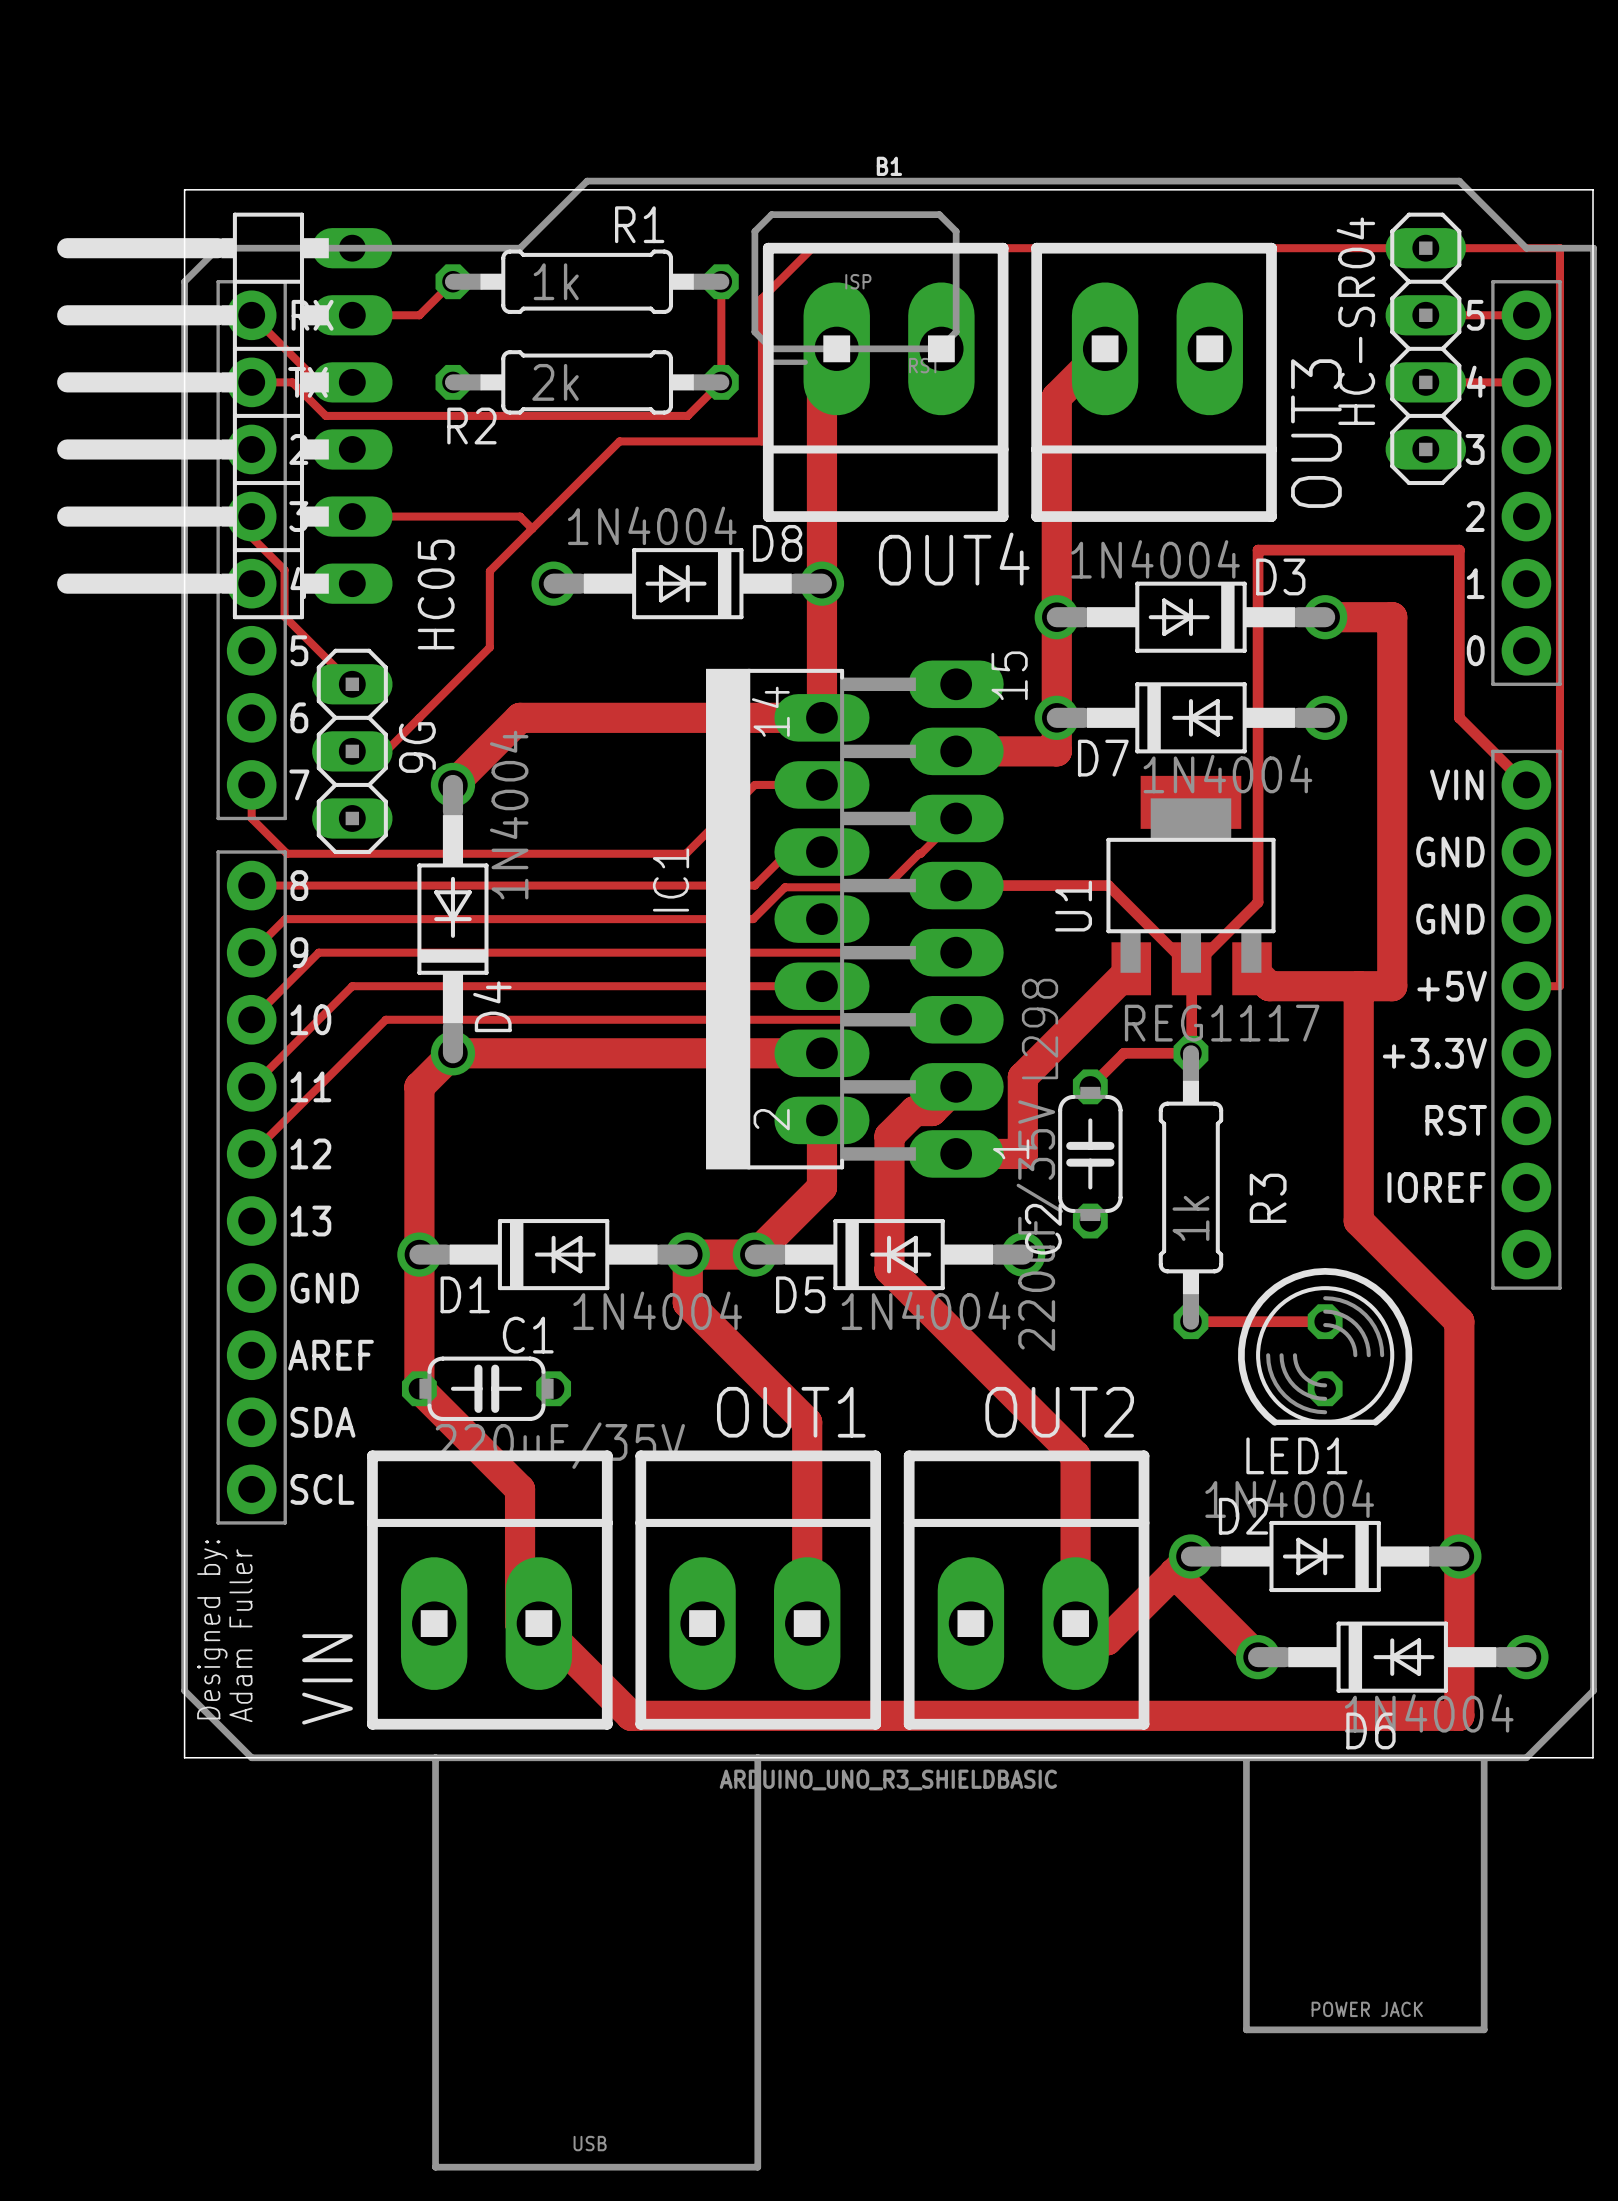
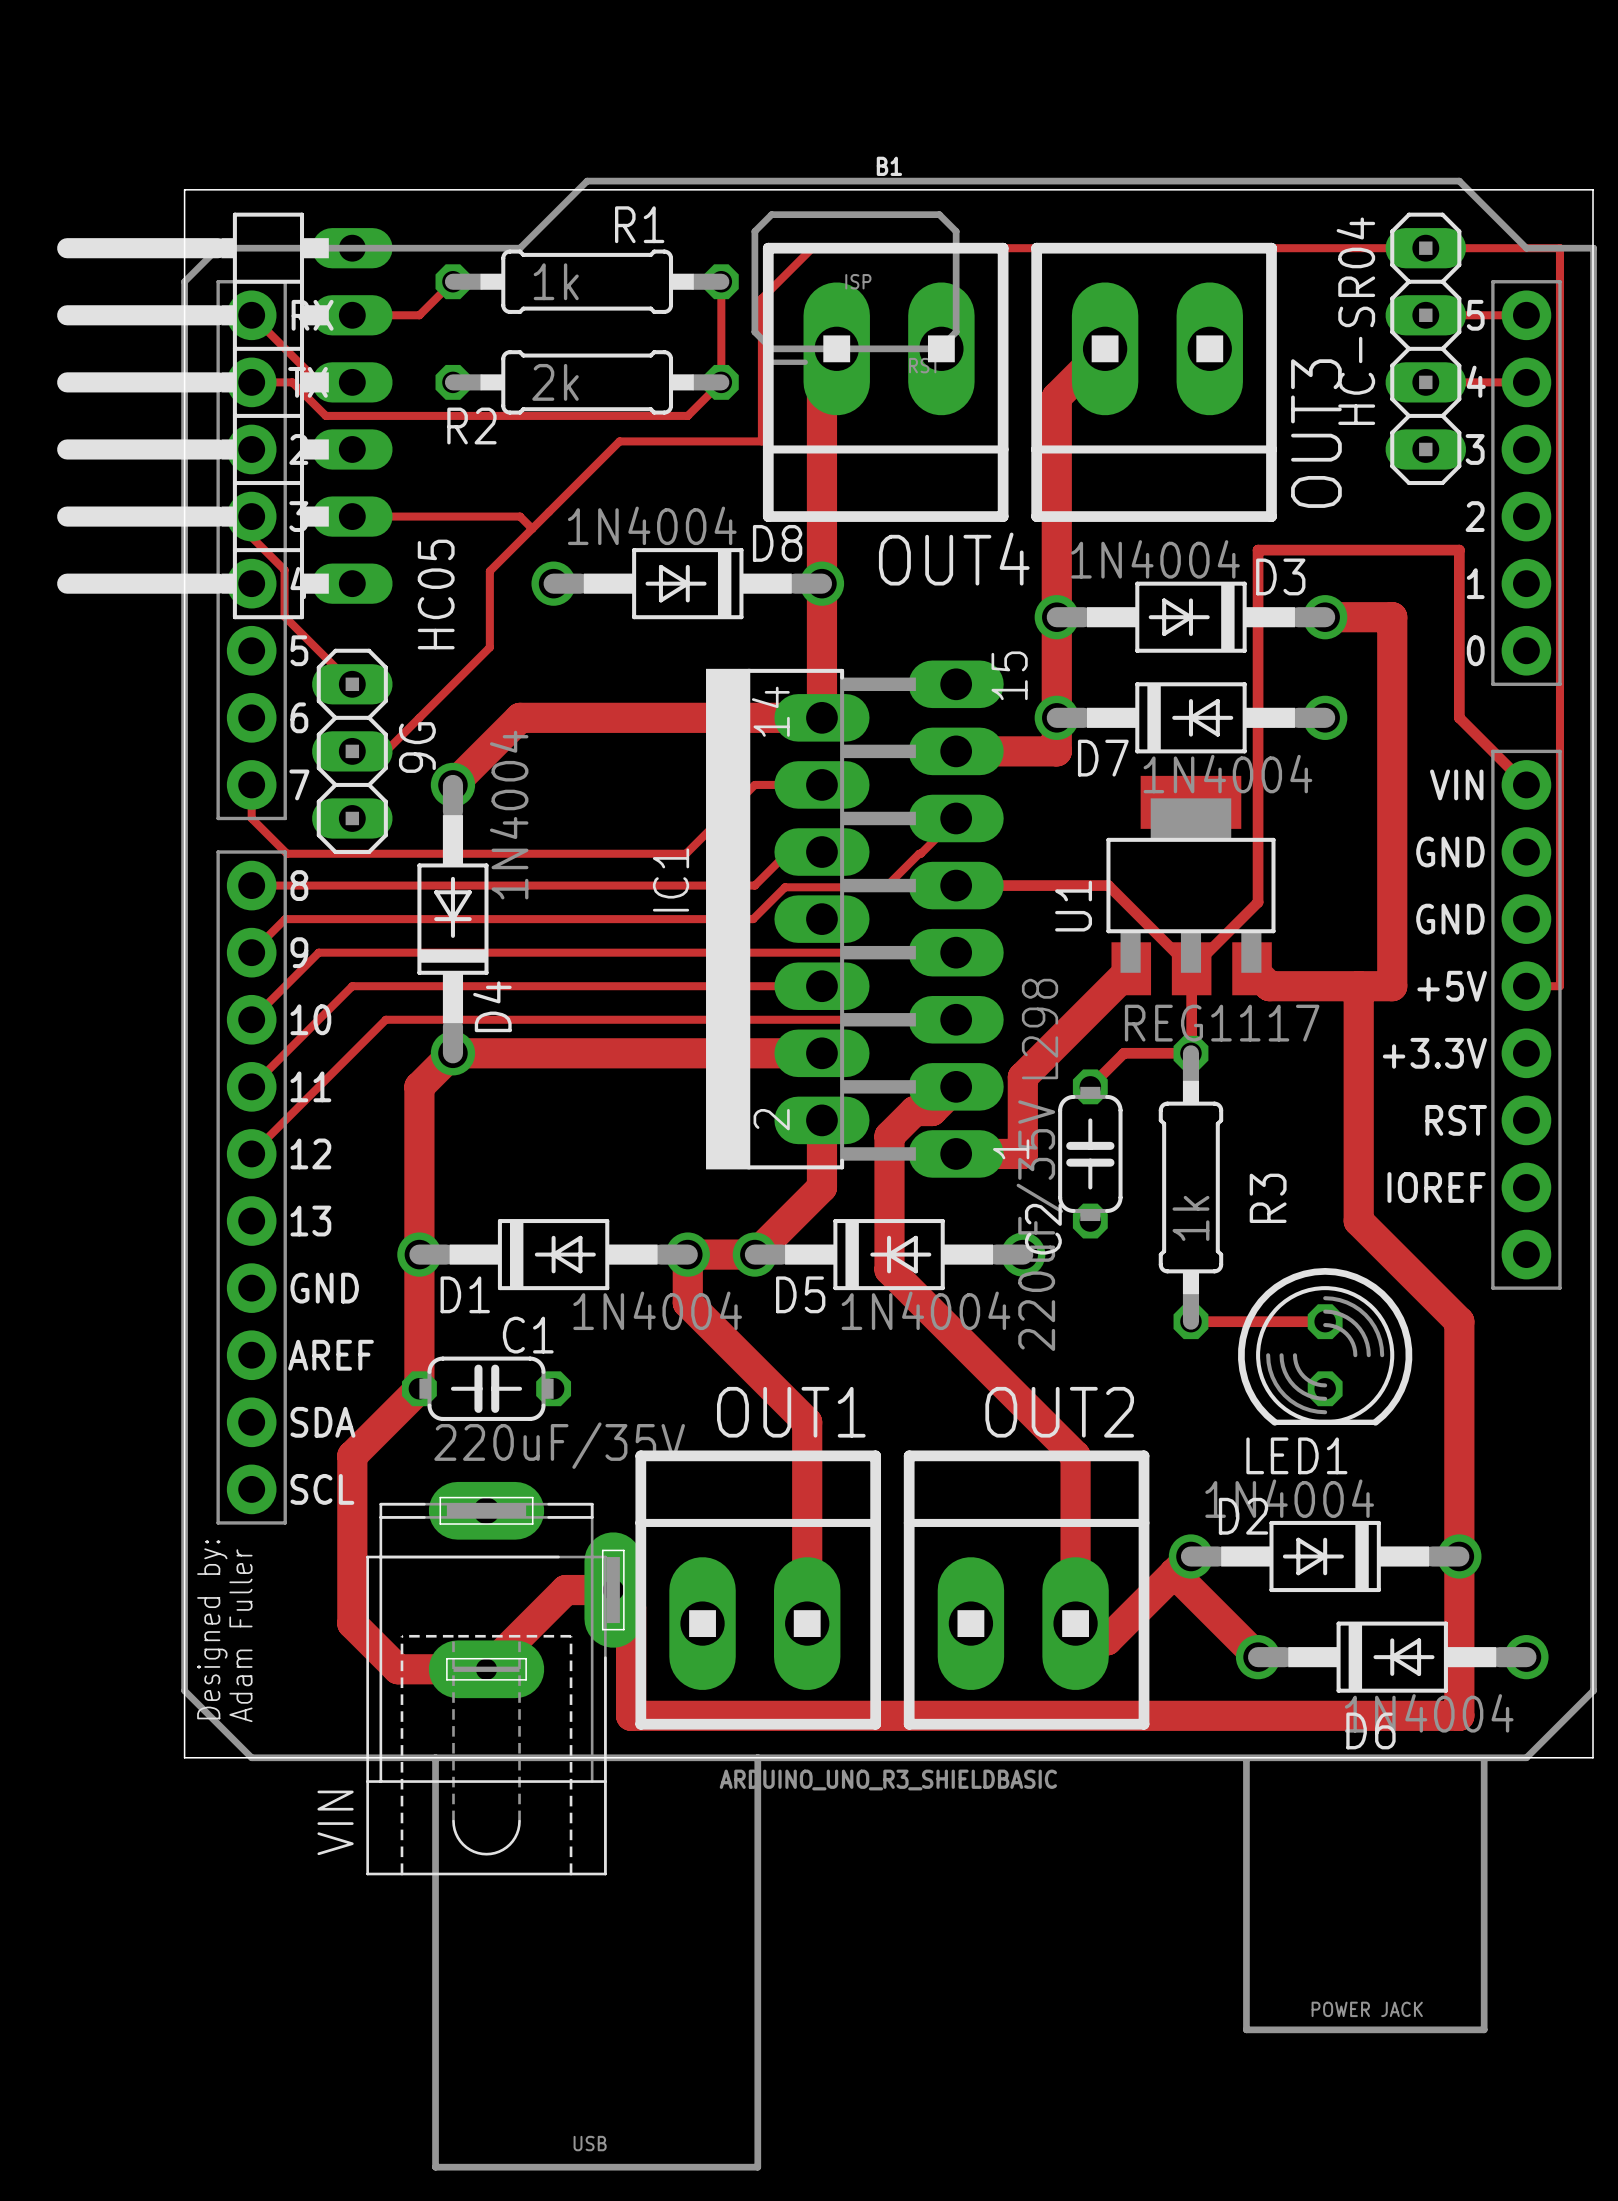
top track: (419, 1388) (520, 1489) (520, 1623) (538, 1623) (631, 1715) -> (419, 1388) (352, 1455) (352, 1623) (398, 1669) (486, 1669) (565, 1590) (613, 1590) (631, 1607) (631, 1715)
VIN: (489, 1590) -> none
VIN: none -> (504, 1678)

